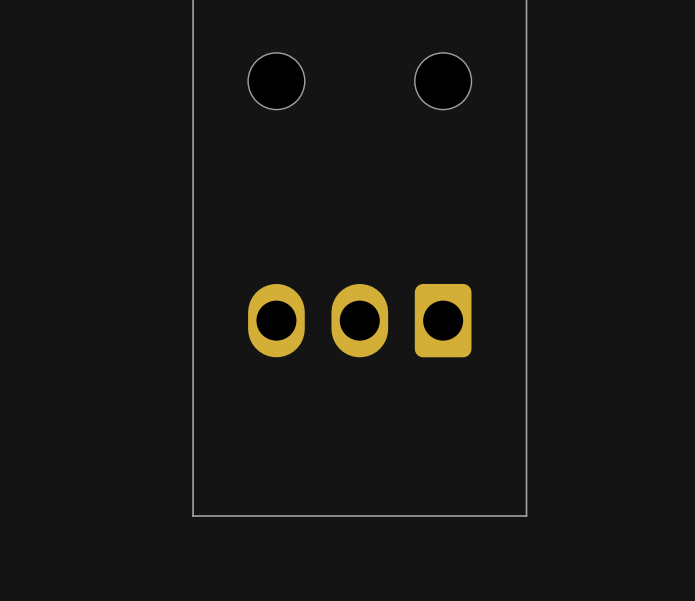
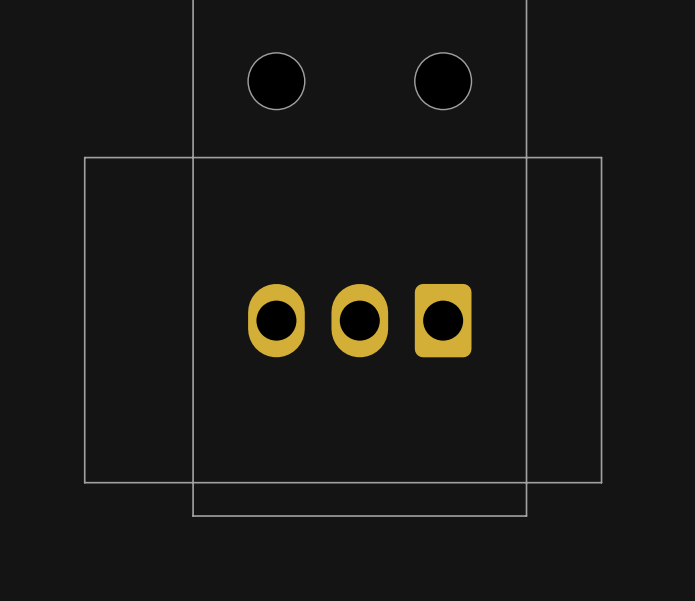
board edge: none -> (601, 157) (601, 482) (84, 482) (84, 157) (601, 157)

